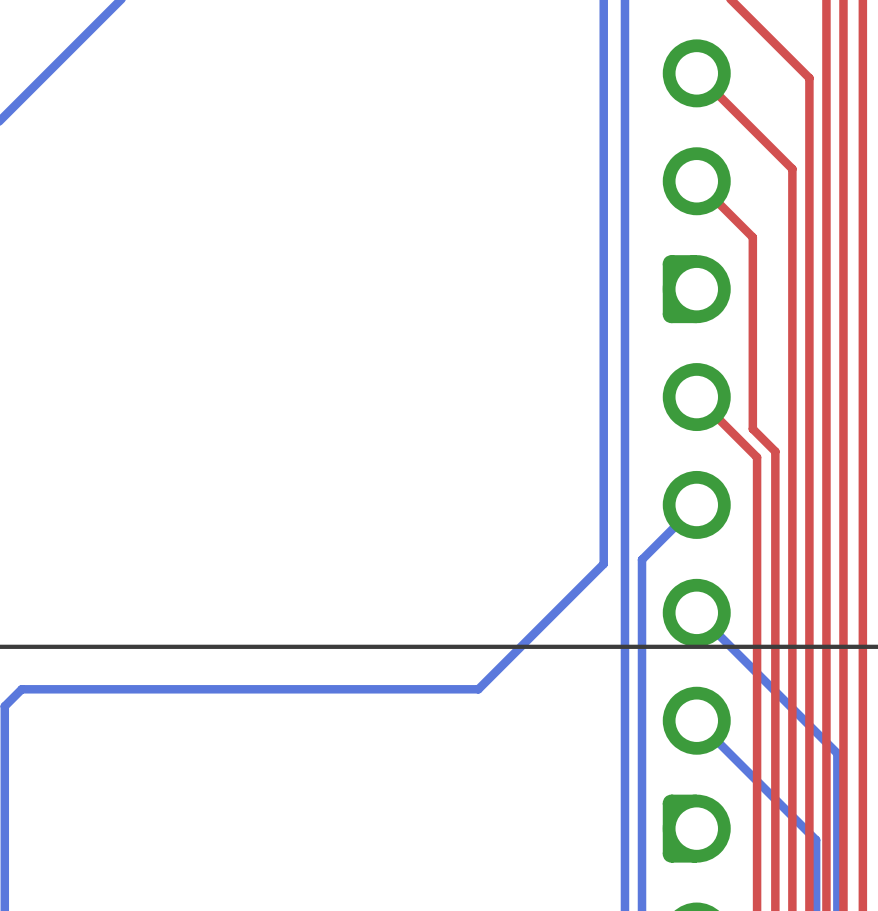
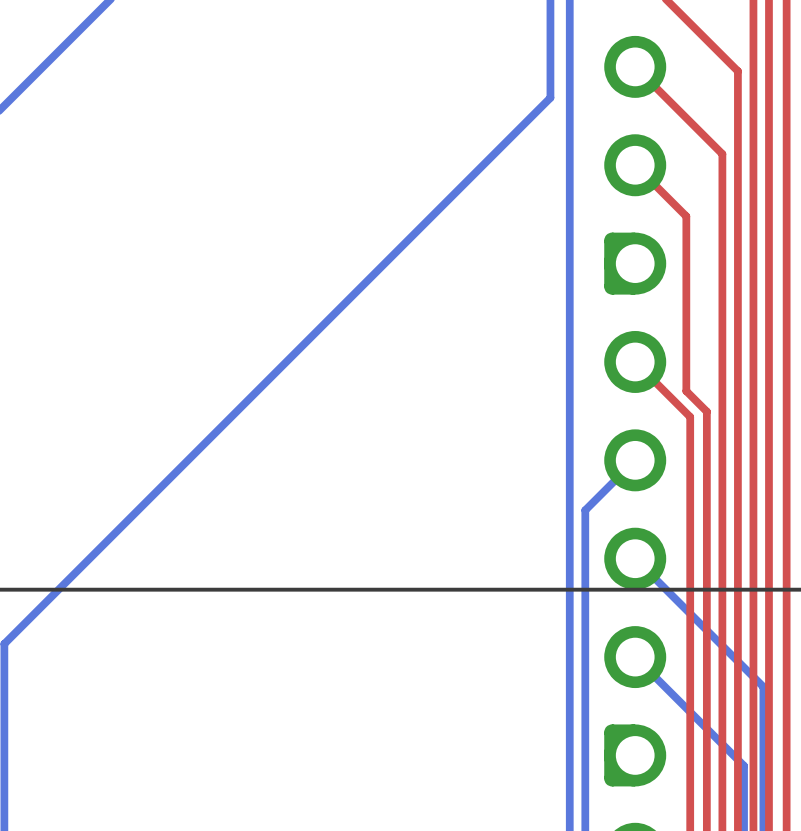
bottom track: (603, 107) (603, 563) (478, 689) (21, 689) -> (550, 97) (19, 628)

